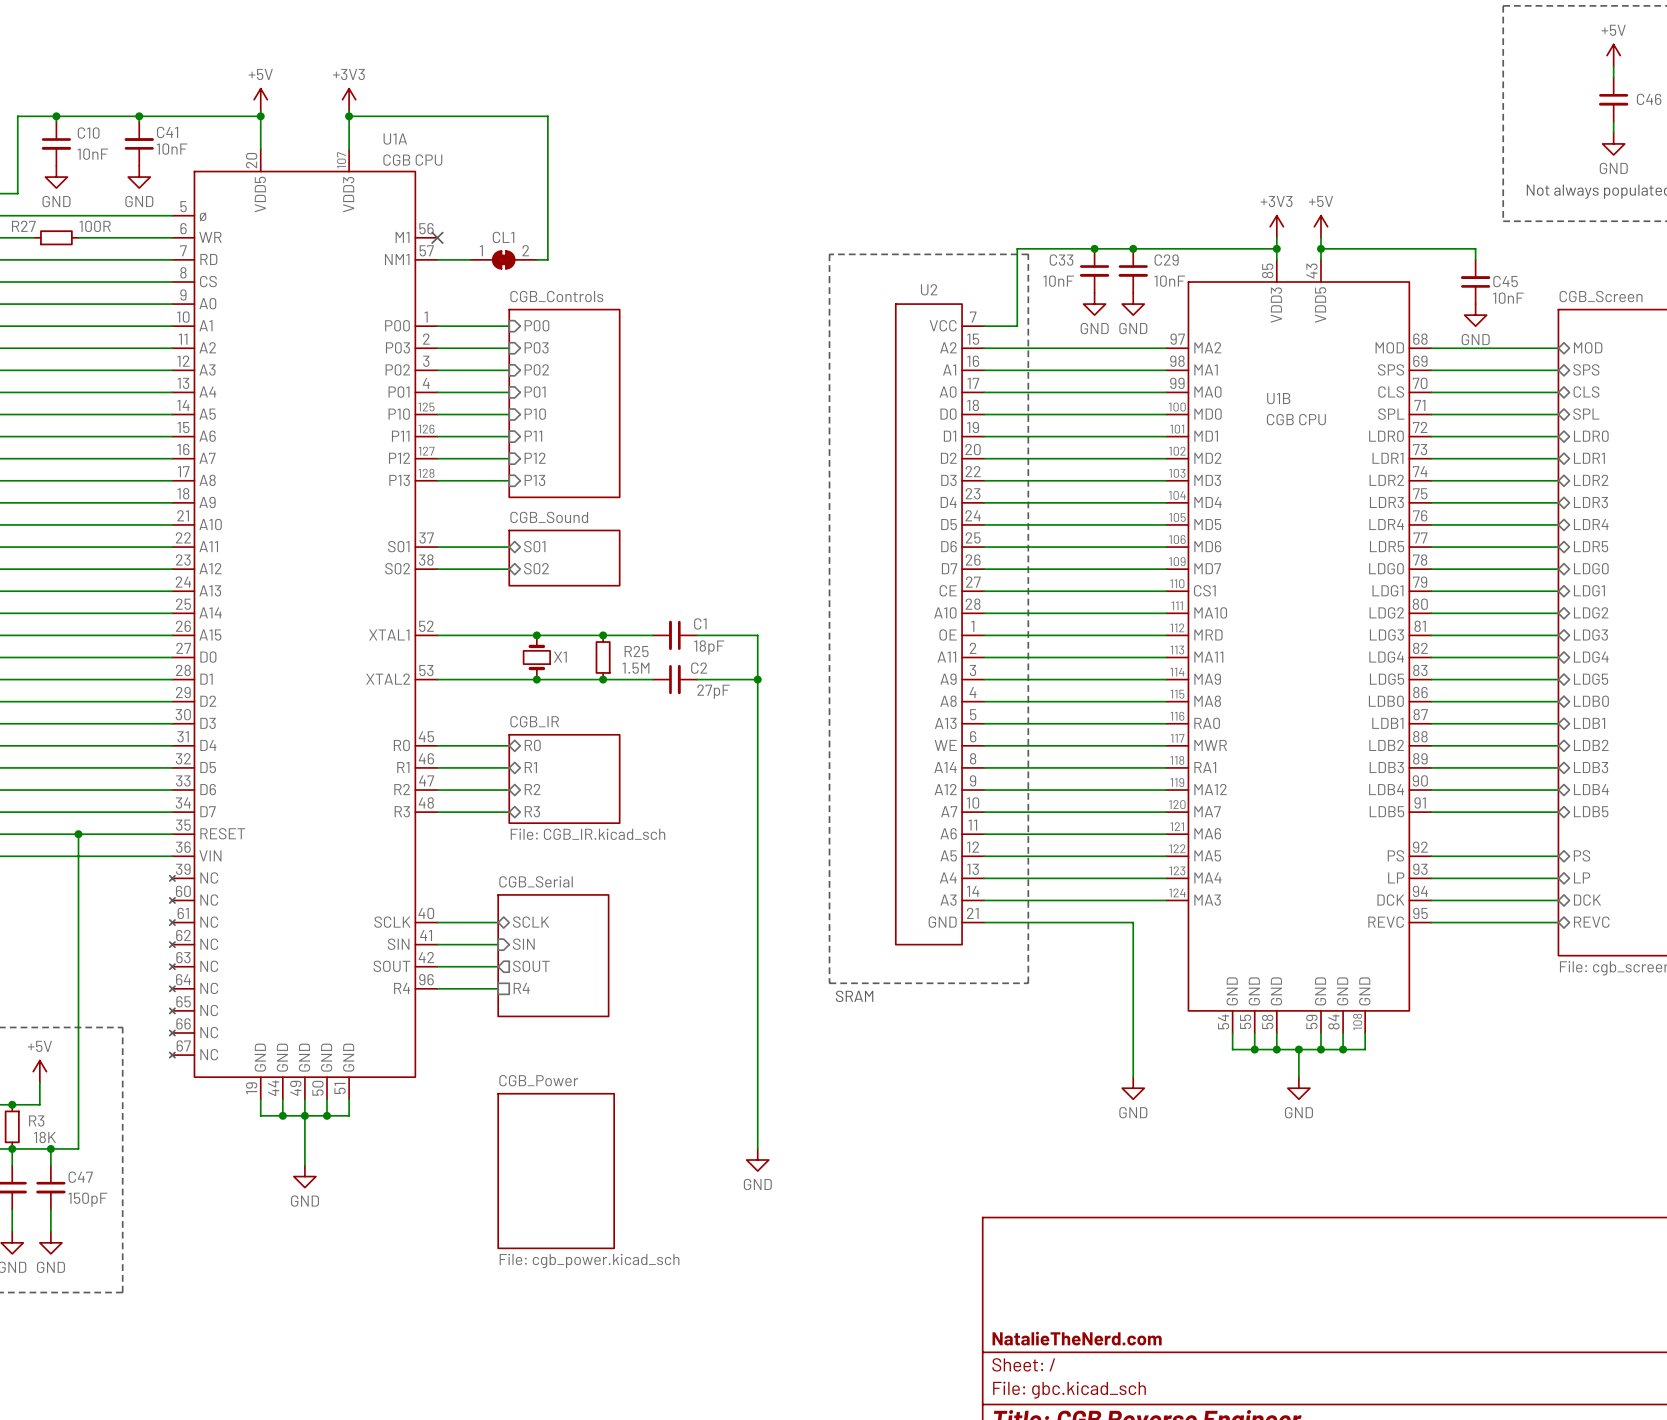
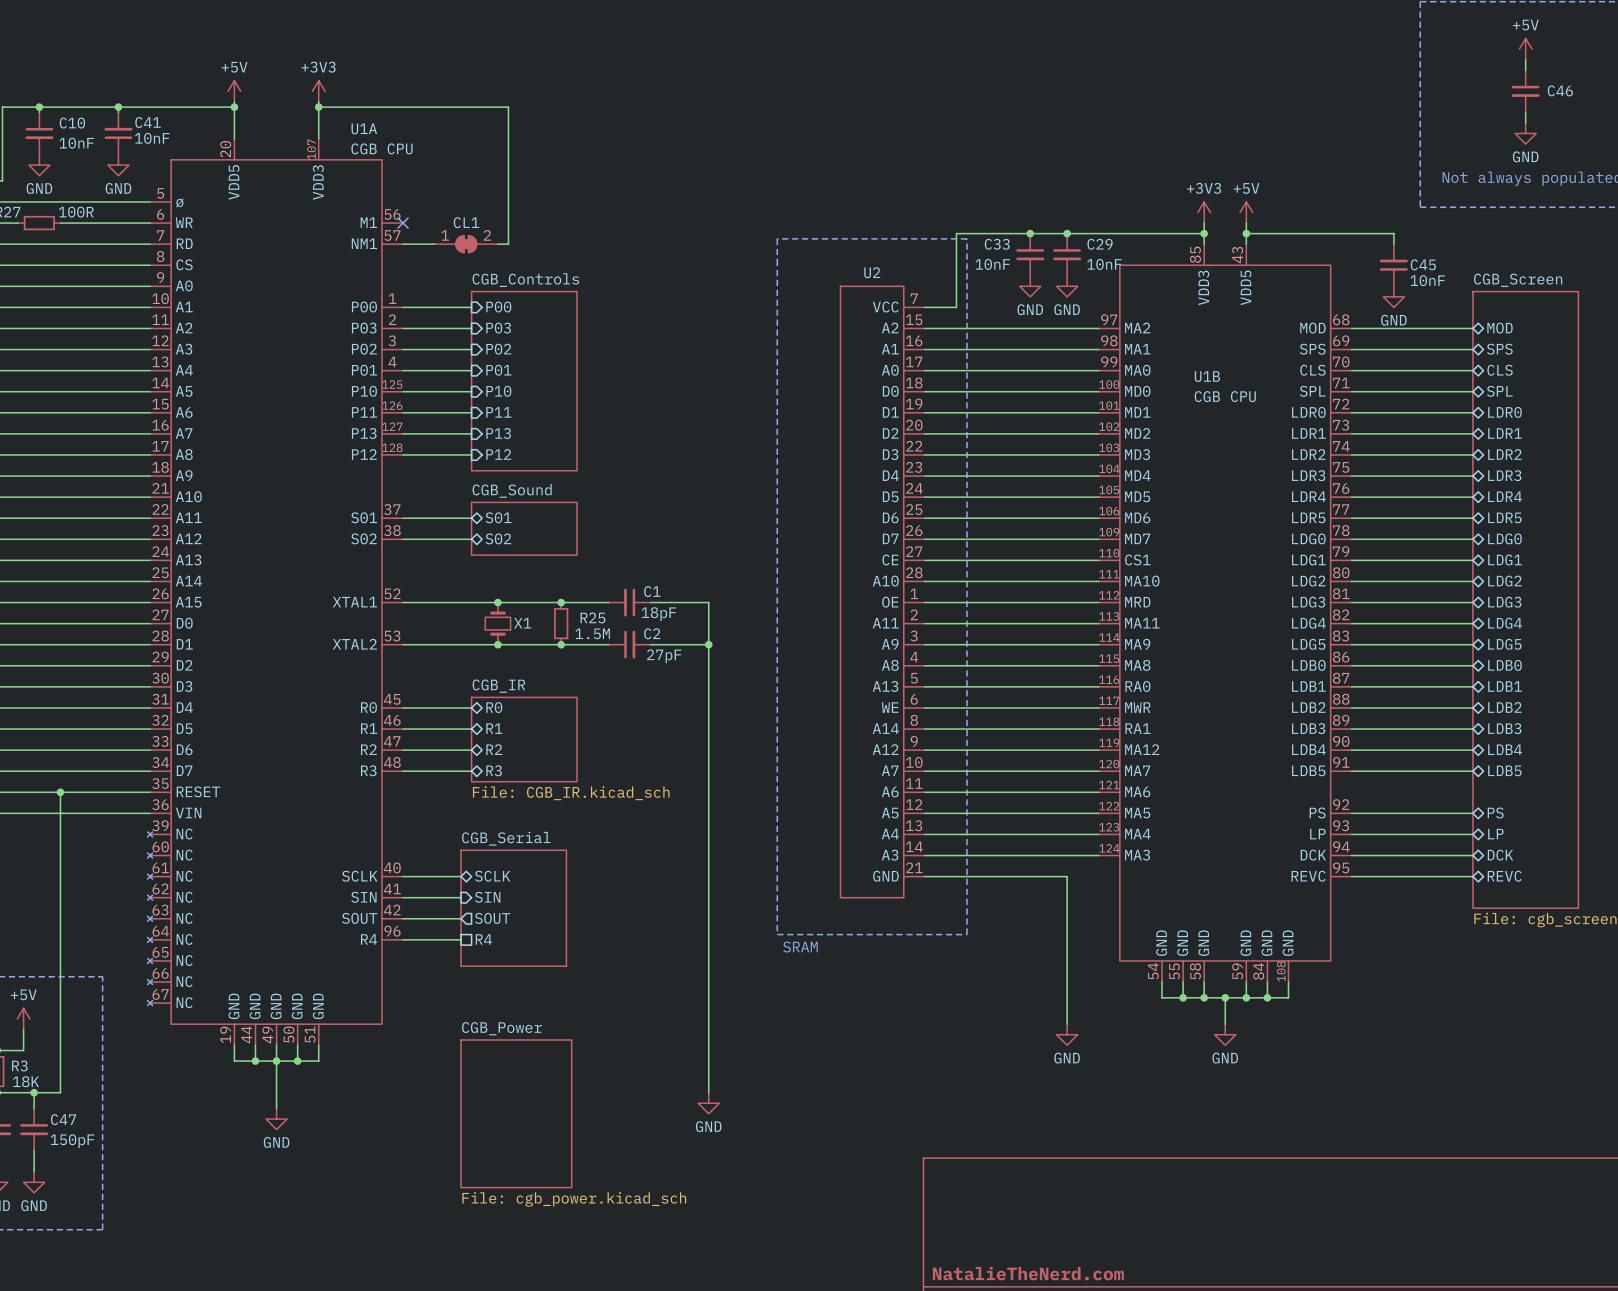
U1A pin name: P12 (399, 458) -> P13 (364, 433)
sheet pin: P12 (535, 458) -> P13 (498, 433)
U1A pin name: P13 (399, 480) -> P12 (364, 454)
sheet pin: P13 (534, 480) -> P12 (498, 454)

